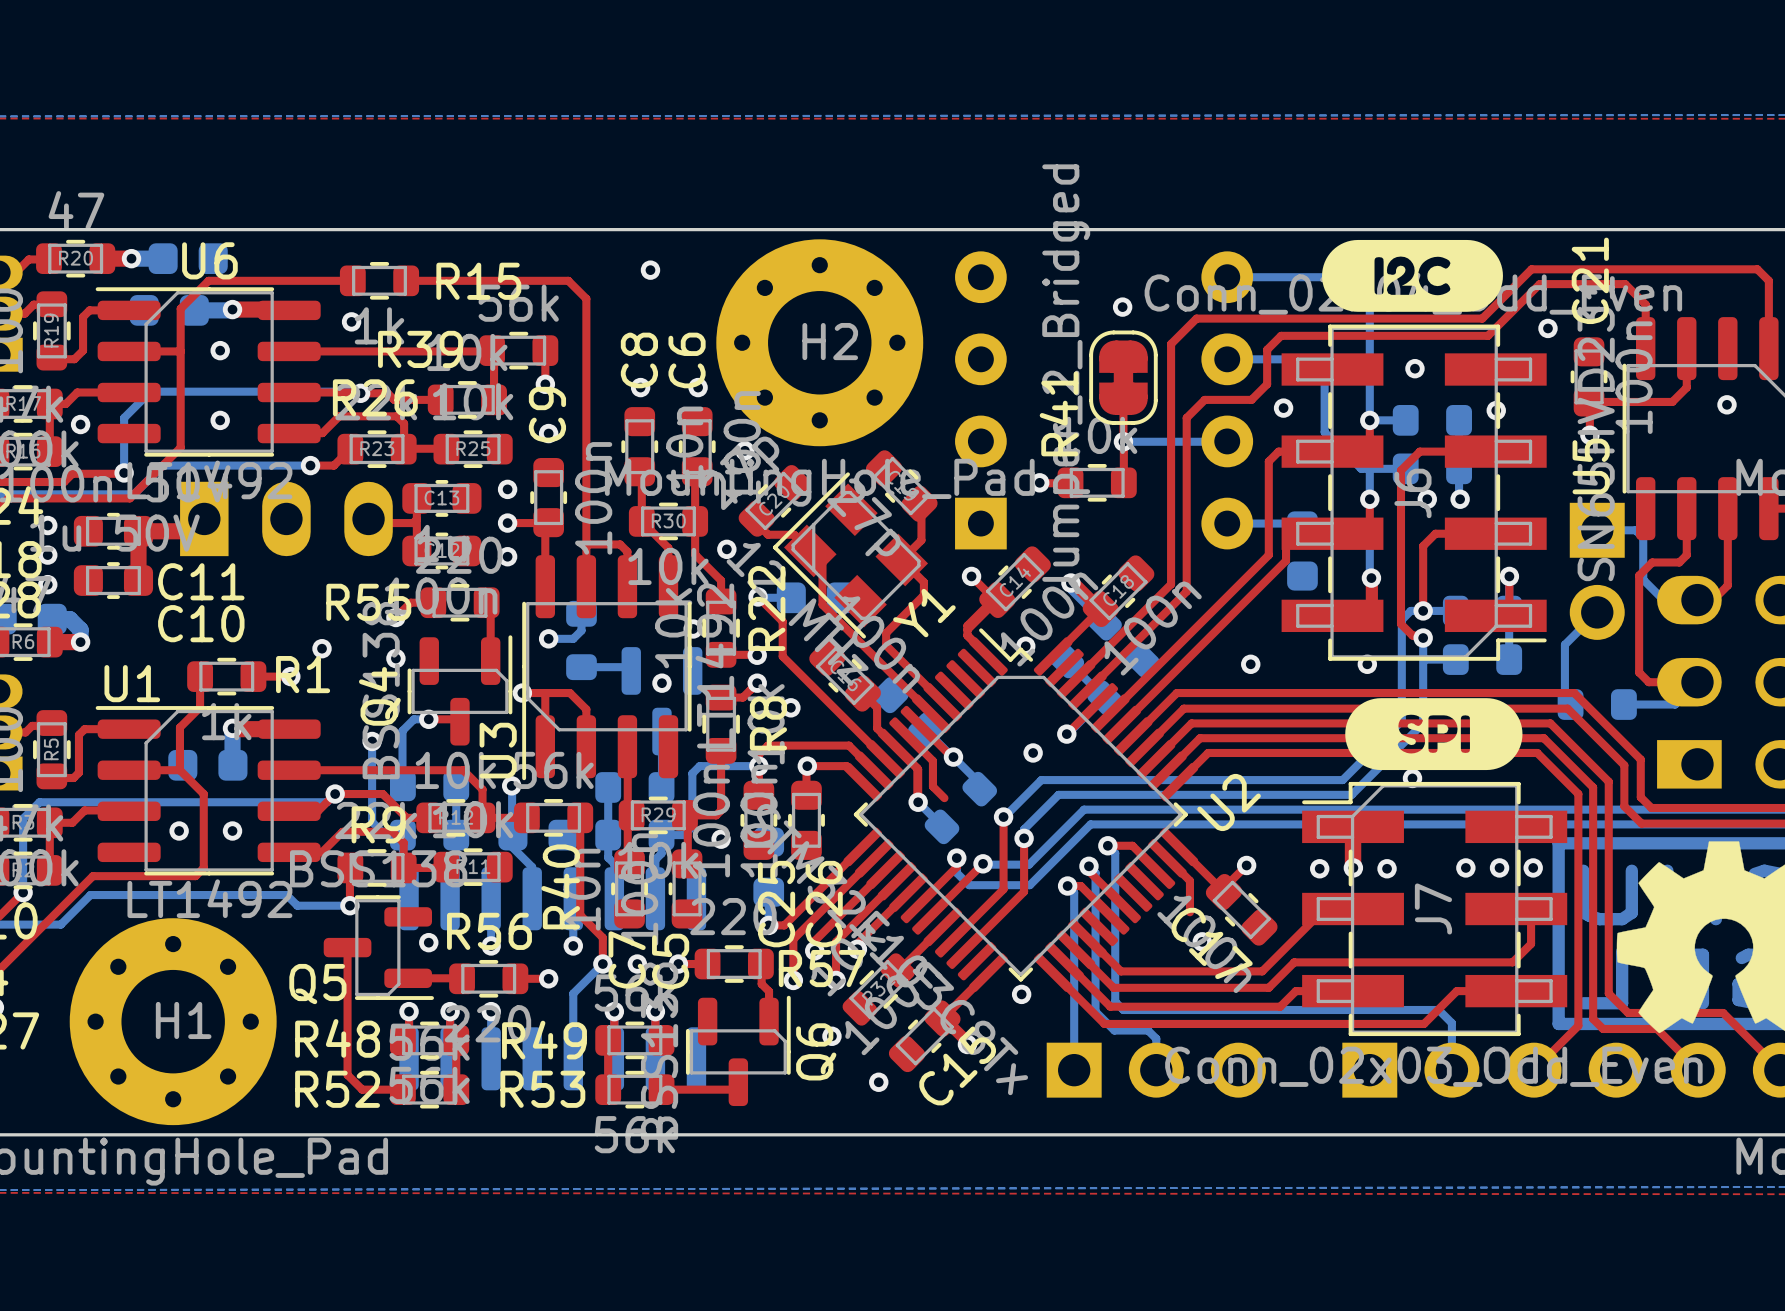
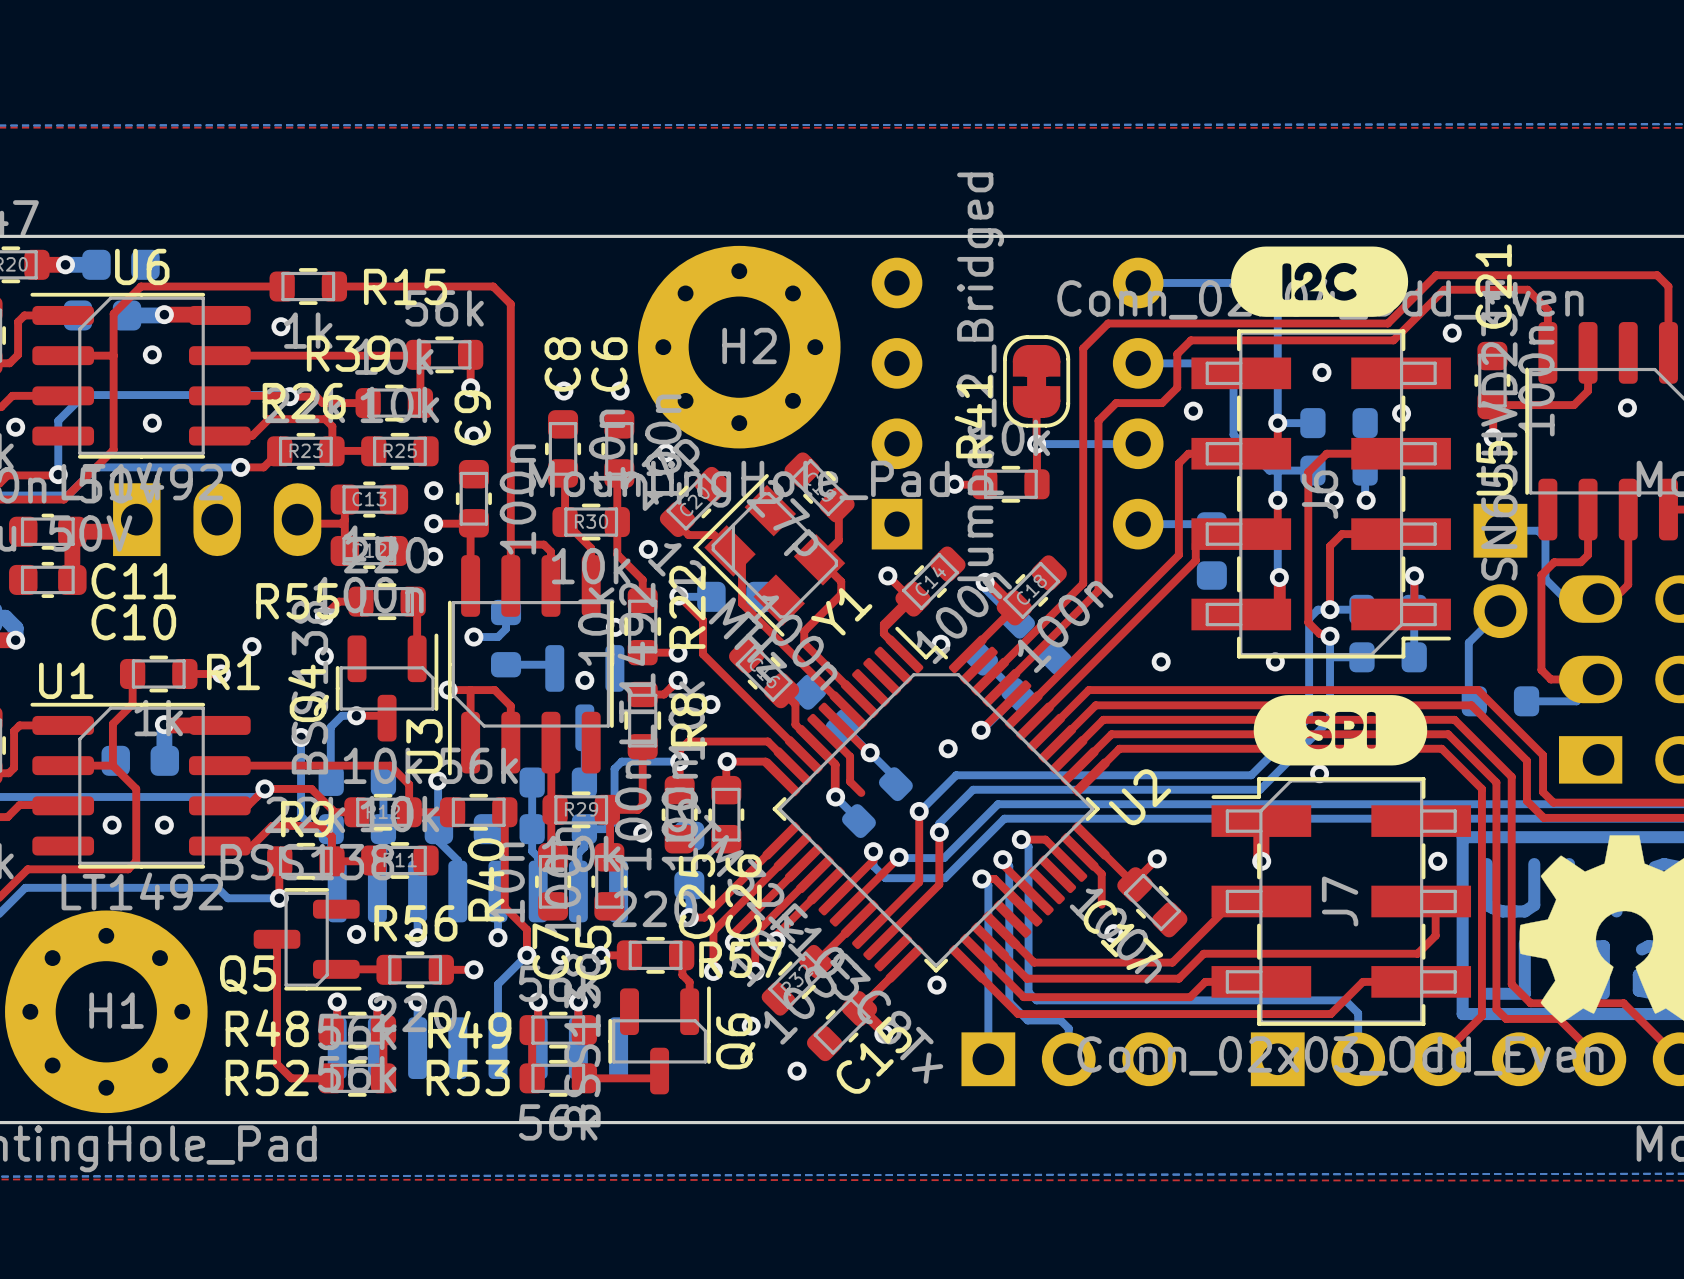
via: (650, 270) -> none
via: (1122, 307) -> none
via: (1465, 867) -> none
via: (1499, 867) -> none
via: (1319, 868) -> none
via: (1387, 868) -> none

